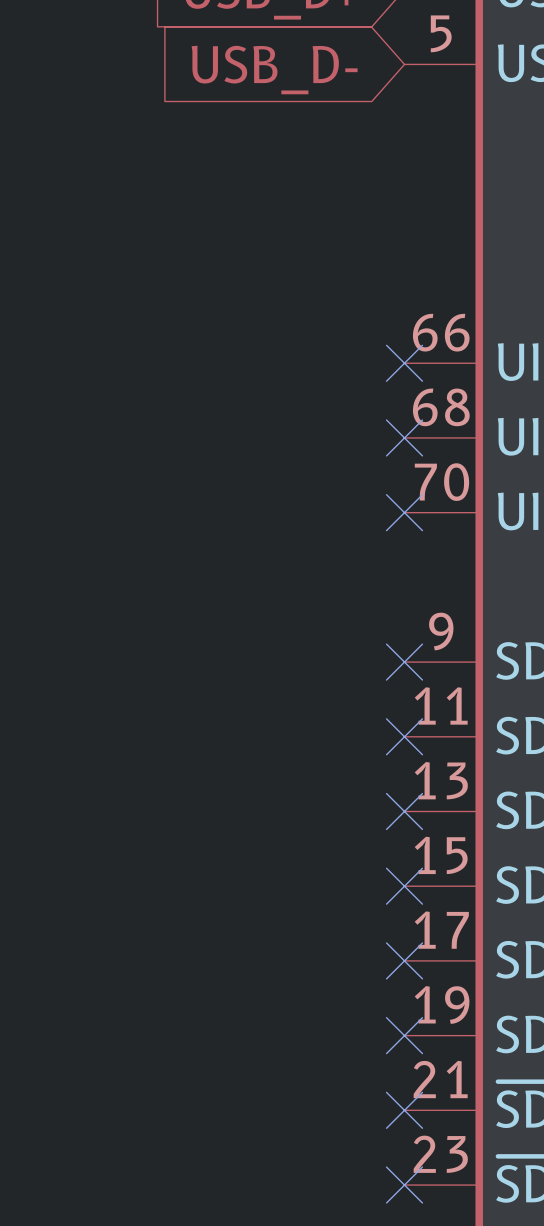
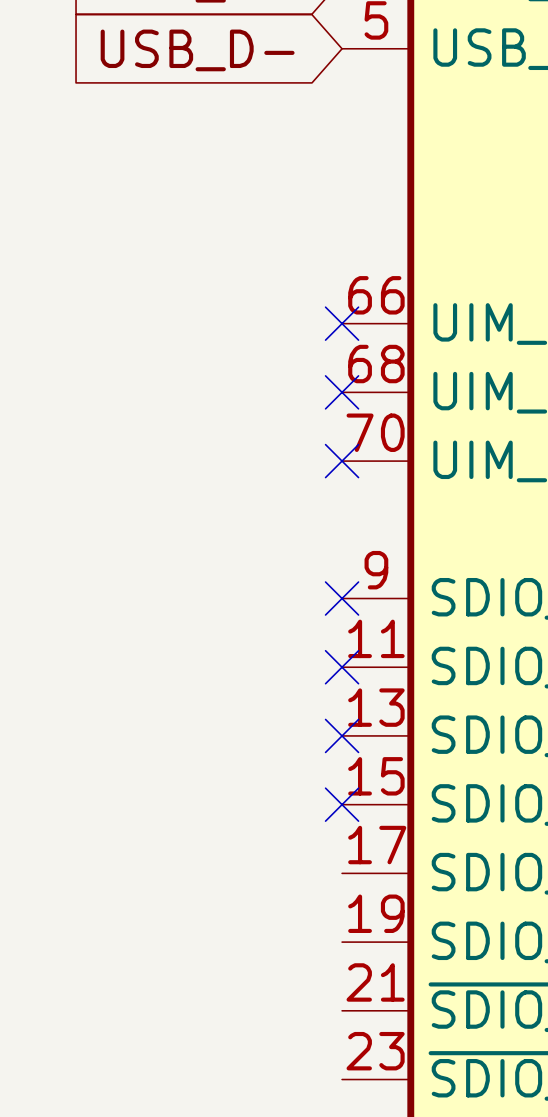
no-connect mark: (404, 960) -> none
no-connect mark: (404, 1035) -> none
no-connect mark: (404, 1110) -> none
no-connect mark: (404, 1185) -> none

